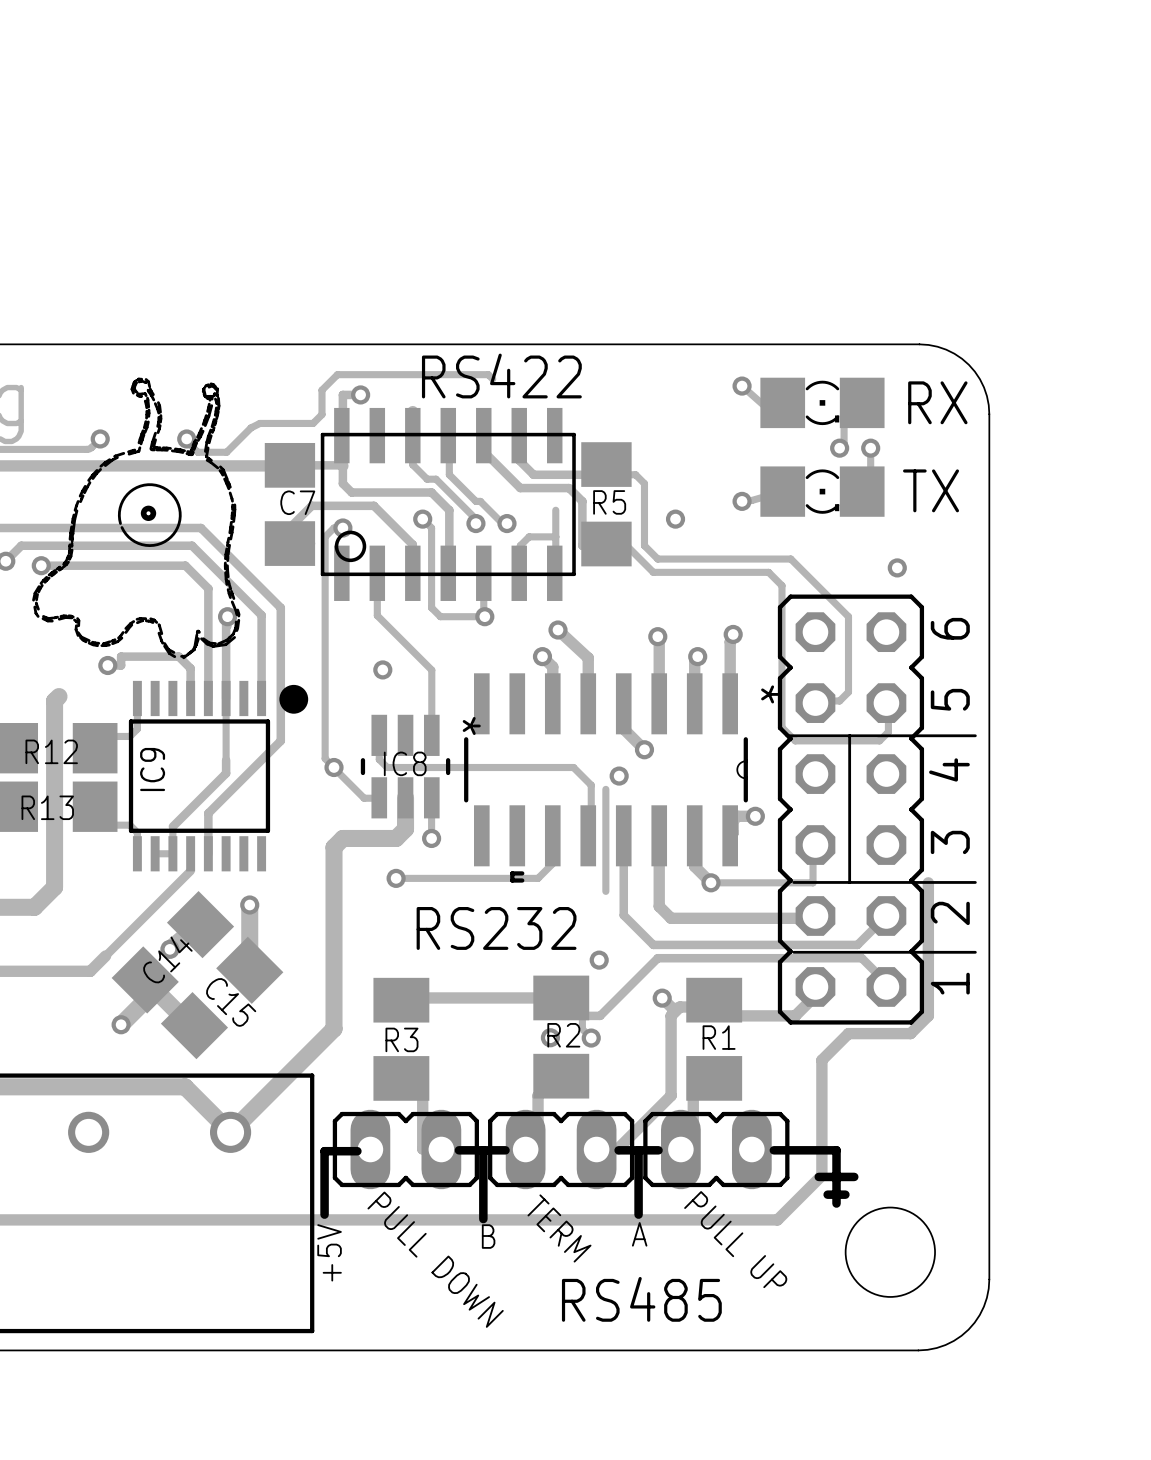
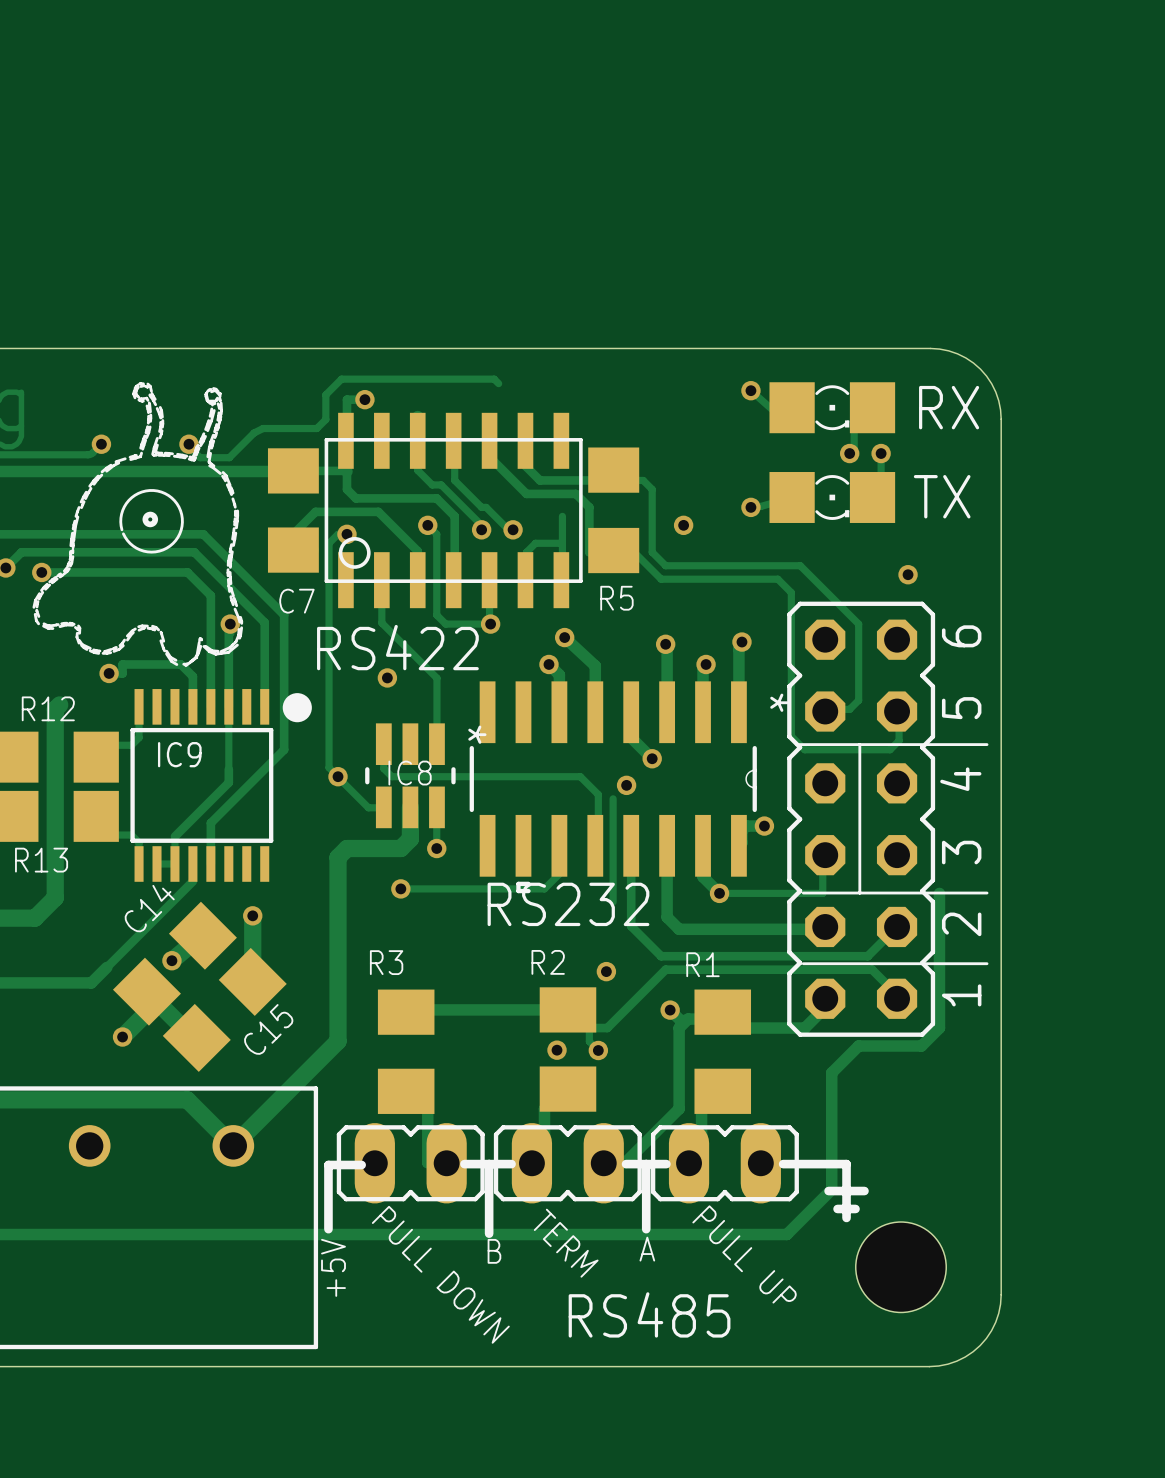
text position: RS422 (501, 376) -> RS422 (397, 647)
C7 name position: C7 (297, 502) -> C7 (296, 601)
R5 name position: R5 (609, 502) -> R5 (616, 598)
R12 name position: R12 (51, 751) -> R12 (48, 708)
IC9 name rotation: 0° (152, 769) -> 90° clockwise (179, 754)
R13 name position: R13 (47, 807) -> R13 (41, 860)
text position: RS232 (496, 928) -> RS232 (568, 904)
C14 name position: C14 (167, 959) -> C14 (149, 908)
C15 name rotation: 0° (231, 1002) -> 90° counterclockwise (268, 1029)
R2 name position: R2 (563, 1035) -> R2 (548, 962)
R1 name position: R1 (719, 1037) -> R1 (702, 964)
R3 name position: R3 (401, 1039) -> R3 (386, 962)

